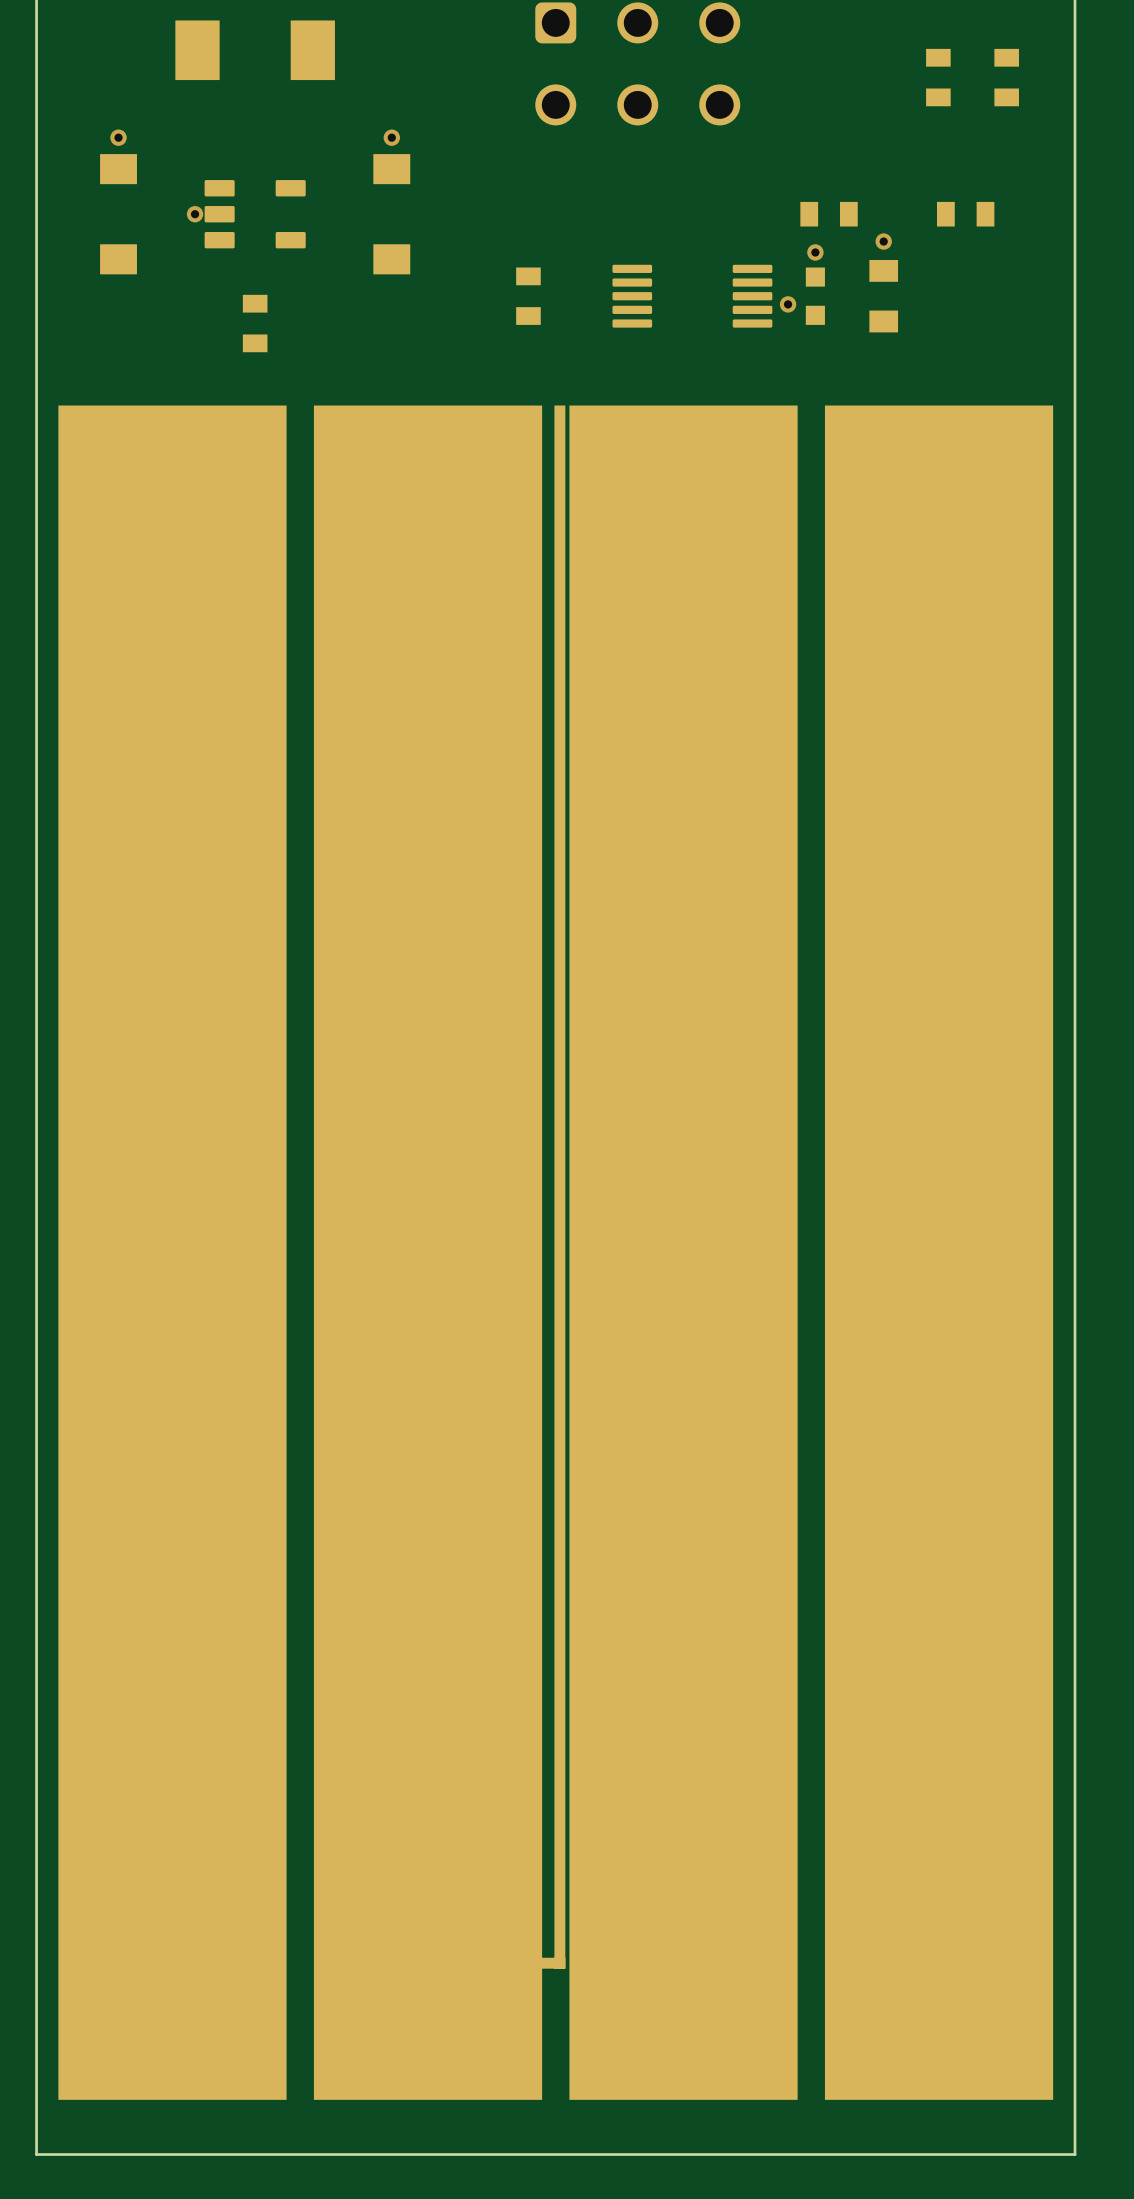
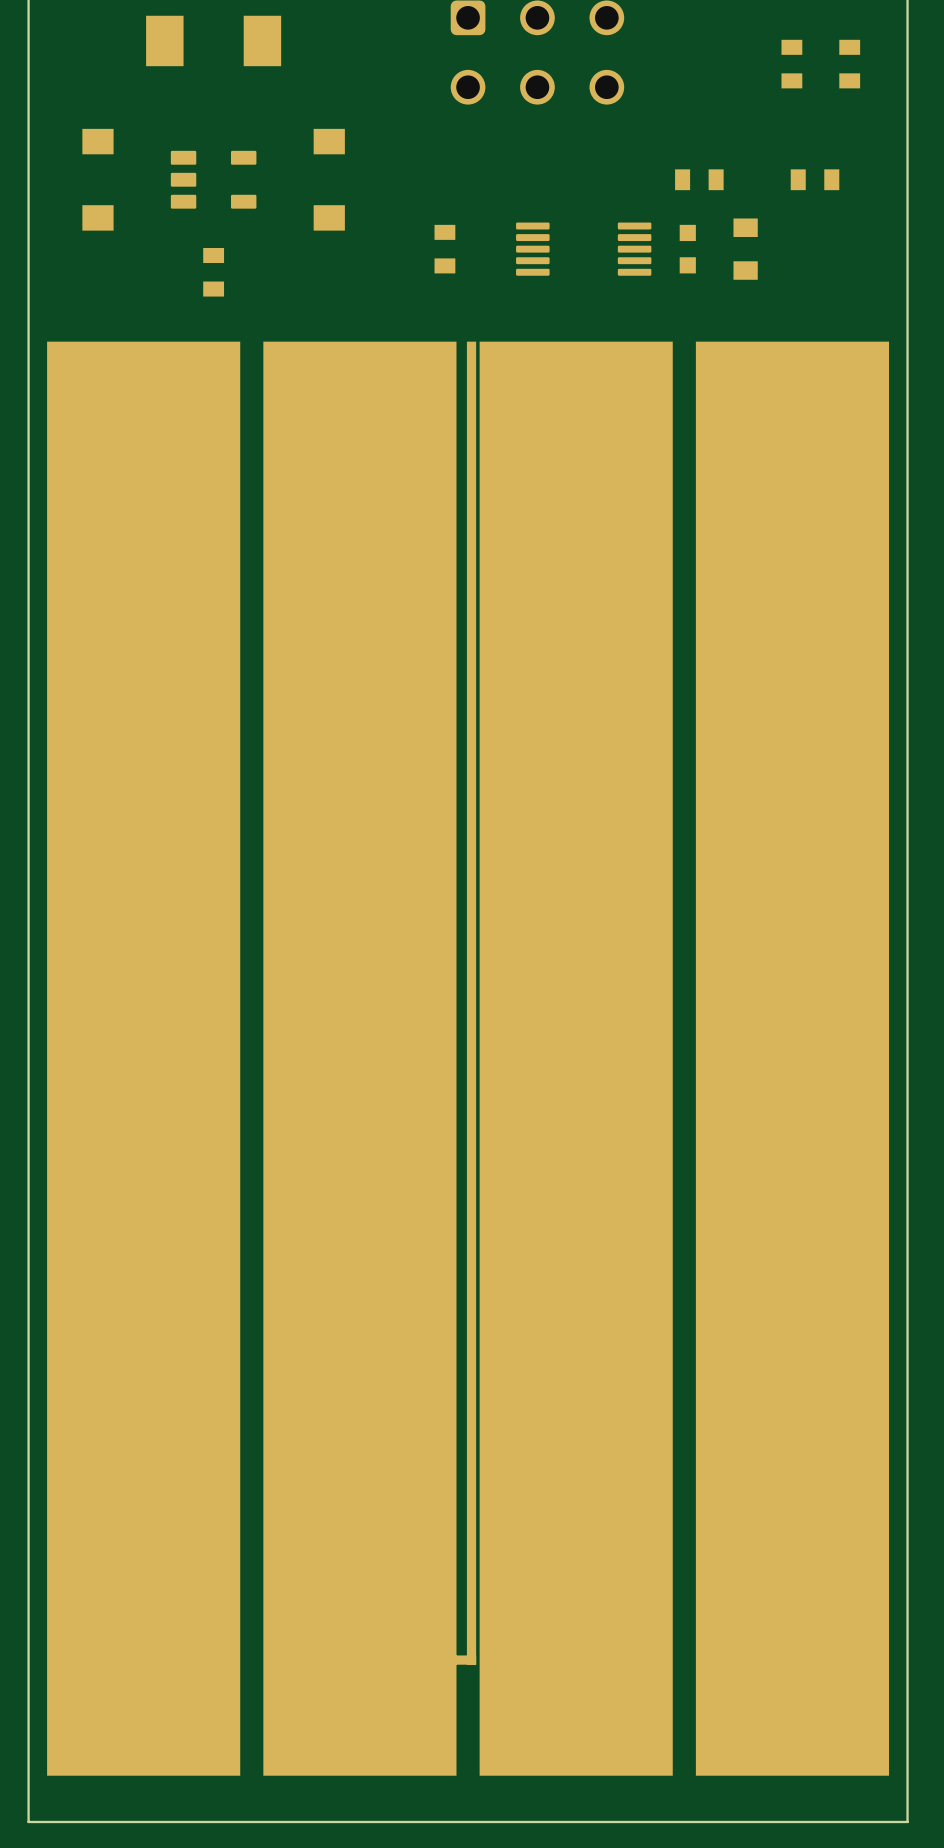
via: (118, 137) -> none
via: (391, 137) -> none
via: (195, 214) -> none
via: (883, 241) -> none
via: (815, 252) -> none
via: (788, 304) -> none

